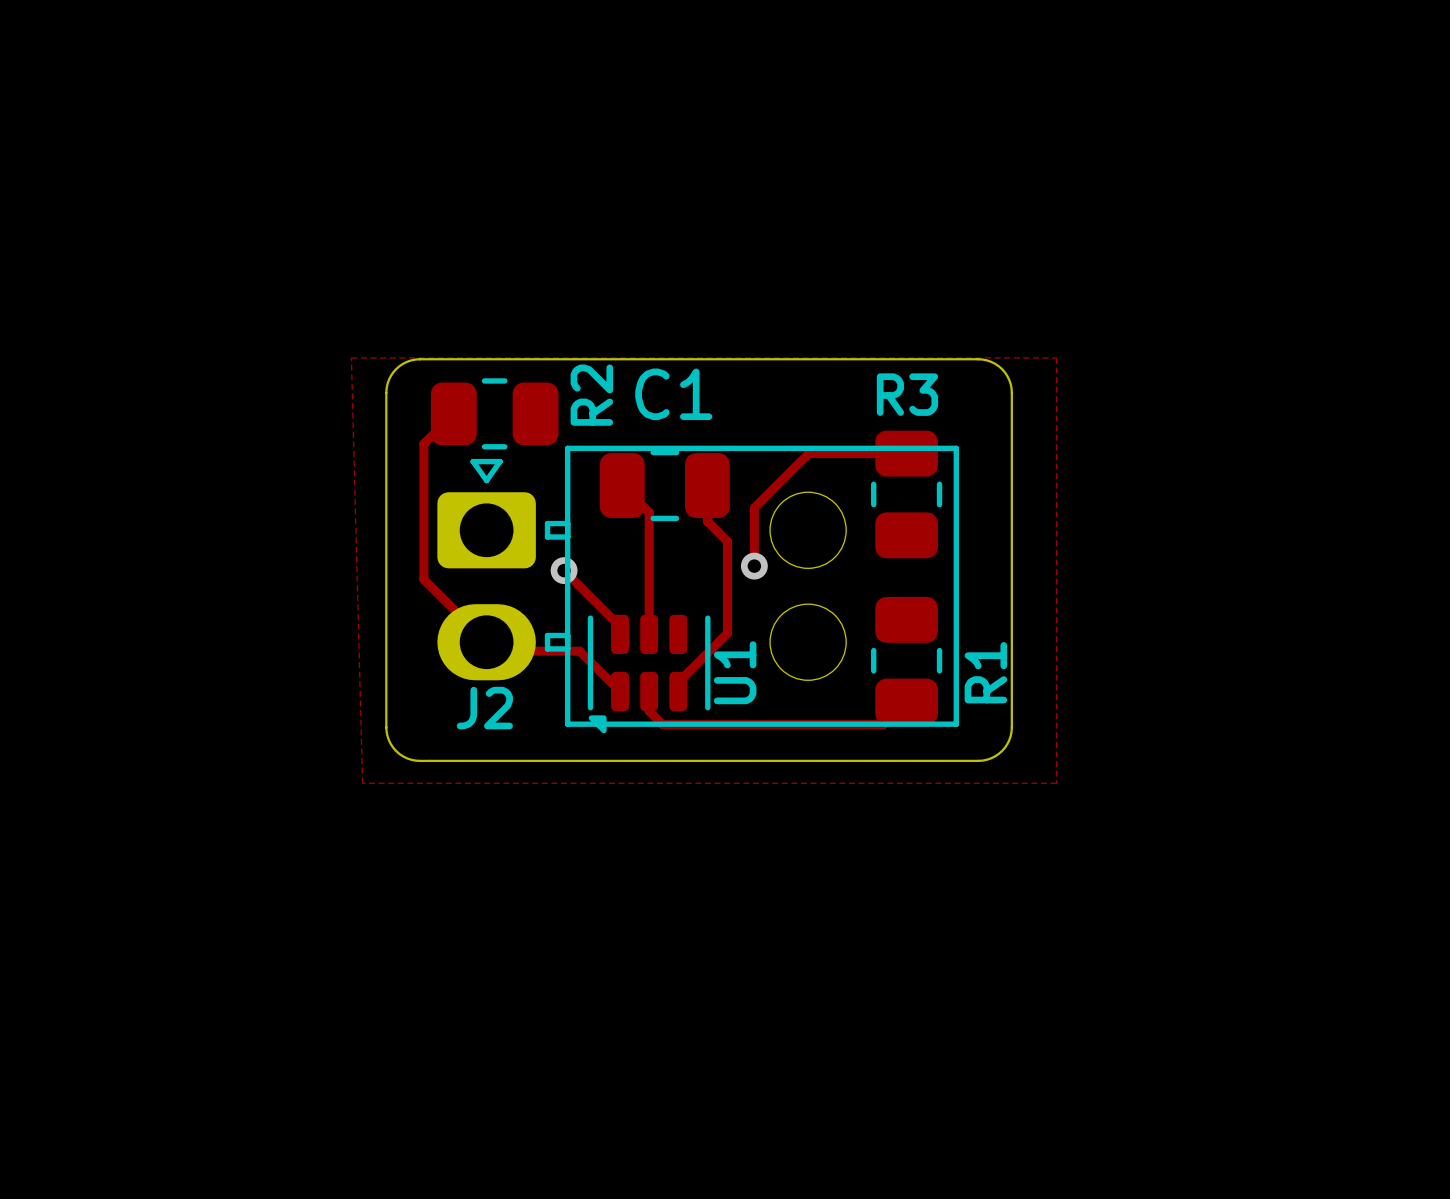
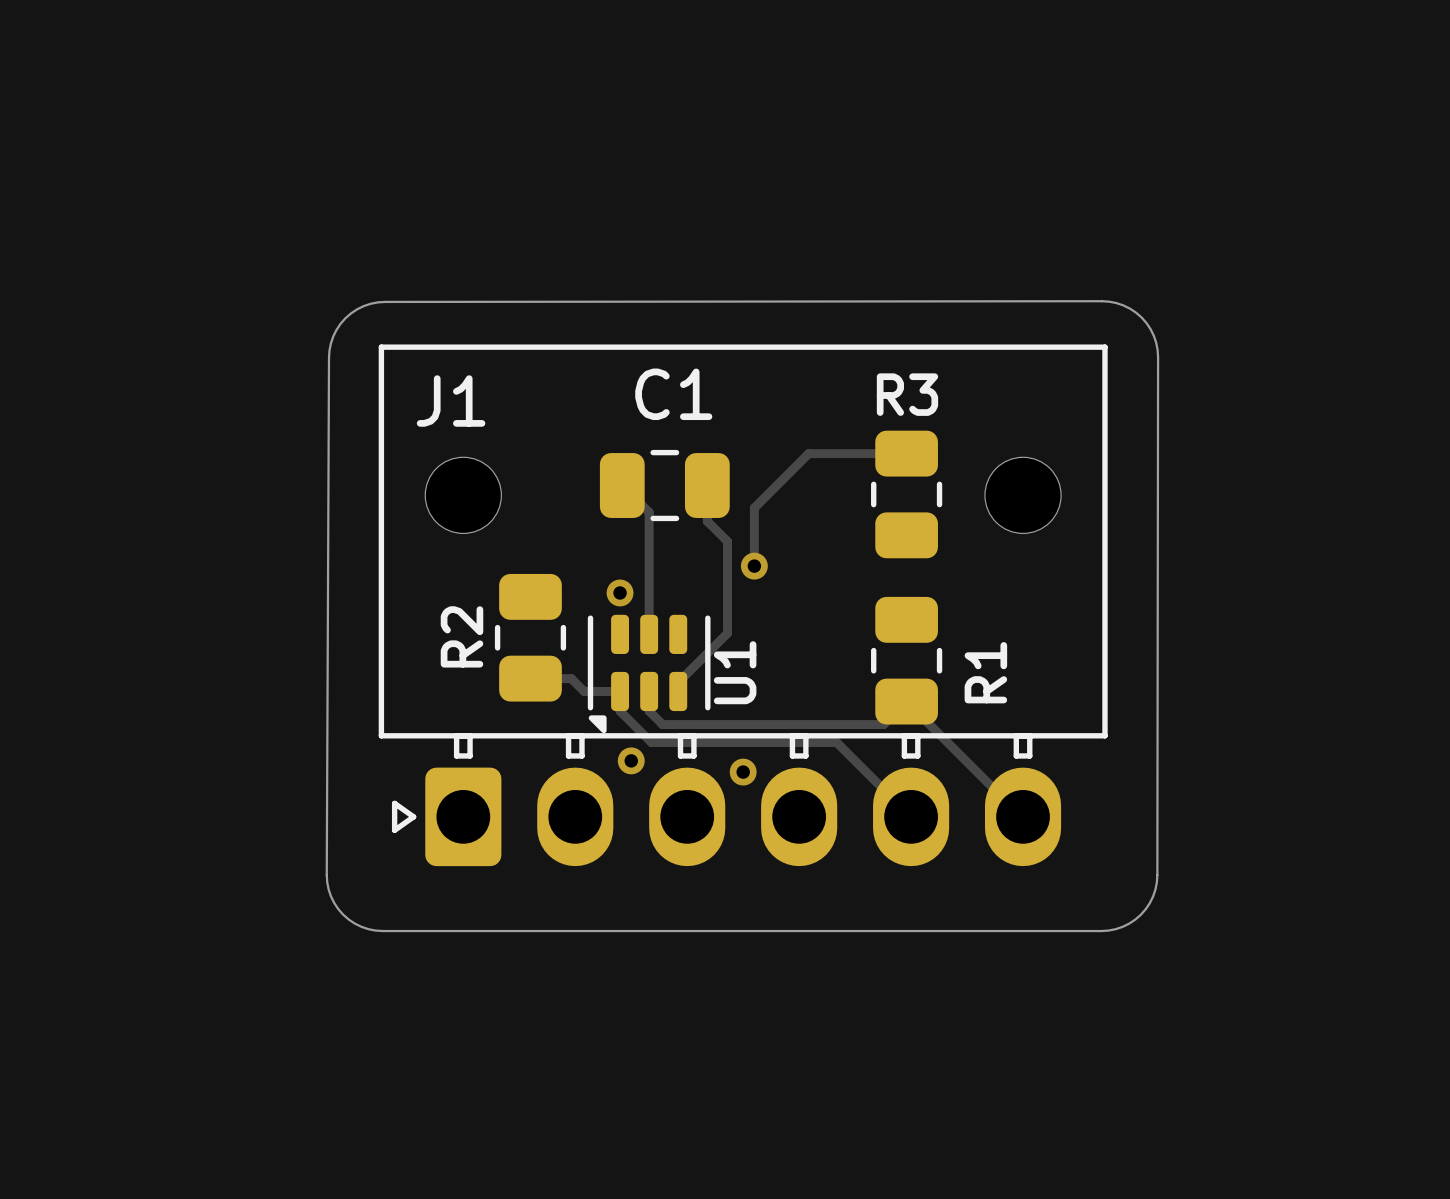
board edge: none -> (1102, 301) (384, 301) (370, 303) (350, 313) (340, 323) (333, 336) (329, 357) (326, 875) (331, 896) (338, 909) (354, 923) (368, 929) (382, 931) (1101, 931) (1122, 926) (1135, 919) (1149, 903) (1155, 889) (1157, 875) (1158, 357) (1153, 335) (1141, 317) (1123, 305) (1102, 301)
zone outline: (351, 357) (1056, 357) (1056, 783) (362, 783) (351, 357) -> none
R2 name position: R2 (591, 395) -> R2 (461, 636)
track: (453, 413) (423, 443) (423, 579) (495, 651) (579, 651) (620, 691) -> none
R2 rotation: 0° (494, 413) -> 90° clockwise (530, 637)
R2 position: (494, 413) -> (530, 637)
track: (564, 570) (618, 625) -> none
via position: (564, 570) -> (620, 592)
J2: (698, 586) -> none
J1: none -> (743, 605)
track: none -> (530, 678) (571, 678) (584, 691) (620, 691) (620, 711) (651, 742) (836, 742) (911, 816)
track: none -> (906, 701) (1023, 816)
board edge: (386, 727) (386, 731) (388, 740) (396, 751) (407, 758) (419, 760) (978, 760) (995, 756) (1007, 744) (1011, 727) (1011, 392) (1007, 376) (995, 363) (978, 359) (419, 359) (403, 363) (390, 376) (386, 392) (386, 727) -> none
via: none -> (631, 760)
via: none -> (743, 772)

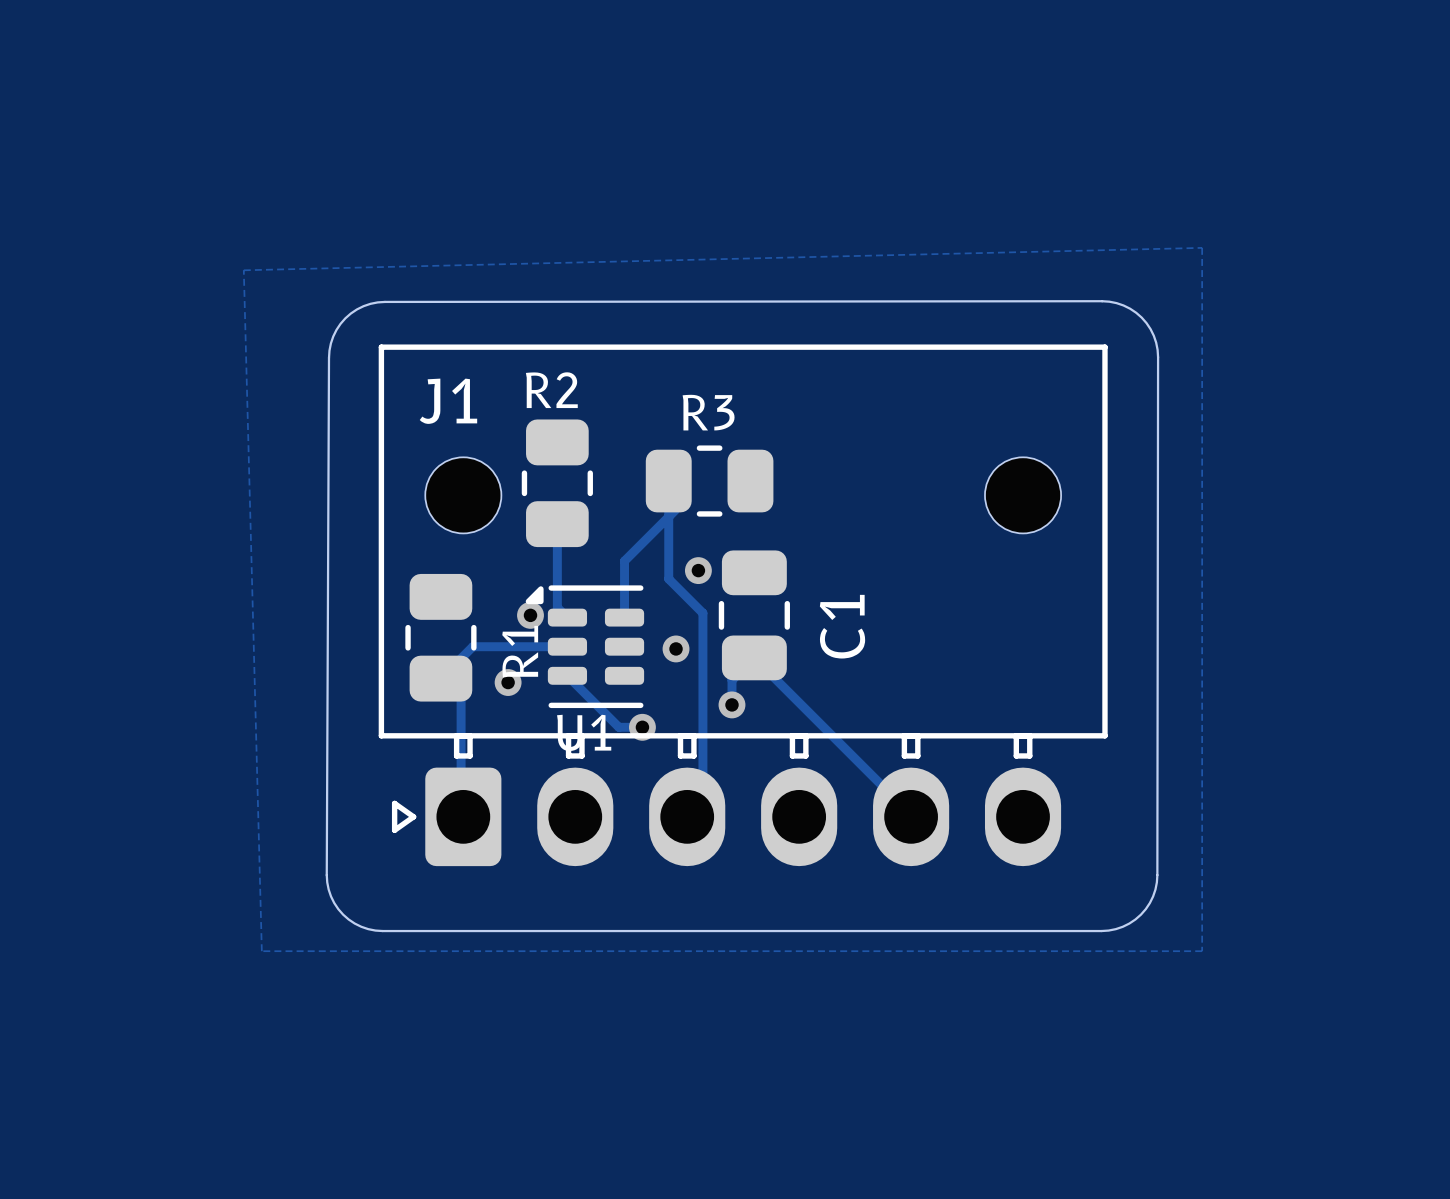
zone outline: none -> (1202, 247) (243, 270) (261, 951) (1202, 951) (1202, 247)
track: (906, 453) (808, 453) (754, 507) (754, 566) -> none
track: none -> (668, 481) (668, 578) (702, 613) (702, 802) (684, 820) (657, 793)
track: (607, 485) (622, 485) (649, 512) (649, 634) -> none
C1 rotation: 0° (664, 485) -> 90° clockwise (754, 615)
C1 position: (664, 485) -> (754, 615)
track: (707, 485) (707, 521) (727, 541) (727, 633) (678, 682) -> none
R3 rotation: 0° (906, 494) -> 90° clockwise (709, 481)
R3 position: (906, 494) -> (709, 481)
track: none -> (675, 510) (624, 561) (624, 617)
track: none -> (557, 524) (557, 607) (567, 617)
via: (754, 566) -> none
via: none -> (698, 570)
via: (620, 592) -> none
via: none -> (530, 615)
R2 name rotation: 0° (461, 636) -> 90° clockwise (551, 390)
R2 name position: R2 (461, 636) -> R2 (551, 390)
R2 position: (530, 637) -> (557, 483)
track: none -> (567, 646) (472, 646) (440, 678) (461, 698) (461, 820)
via: none -> (676, 648)
R1 position: (906, 660) -> (440, 637)
U1 rotation: 0° (649, 674) -> 90° clockwise (584, 646)
track: none -> (567, 675) (618, 727) (642, 727)
track: (530, 678) (571, 678) (584, 691) (620, 691) (620, 711) (651, 742) (836, 742) (911, 816) -> none
via: none -> (508, 682)
track: (649, 682) (649, 711) (662, 724) (883, 724) (906, 701) (1023, 816) -> none
track: none -> (731, 704) (731, 680) (754, 657) (908, 812) (908, 820)
via: none -> (731, 704)
via position: (631, 760) -> (642, 727)
via: (743, 772) -> none

